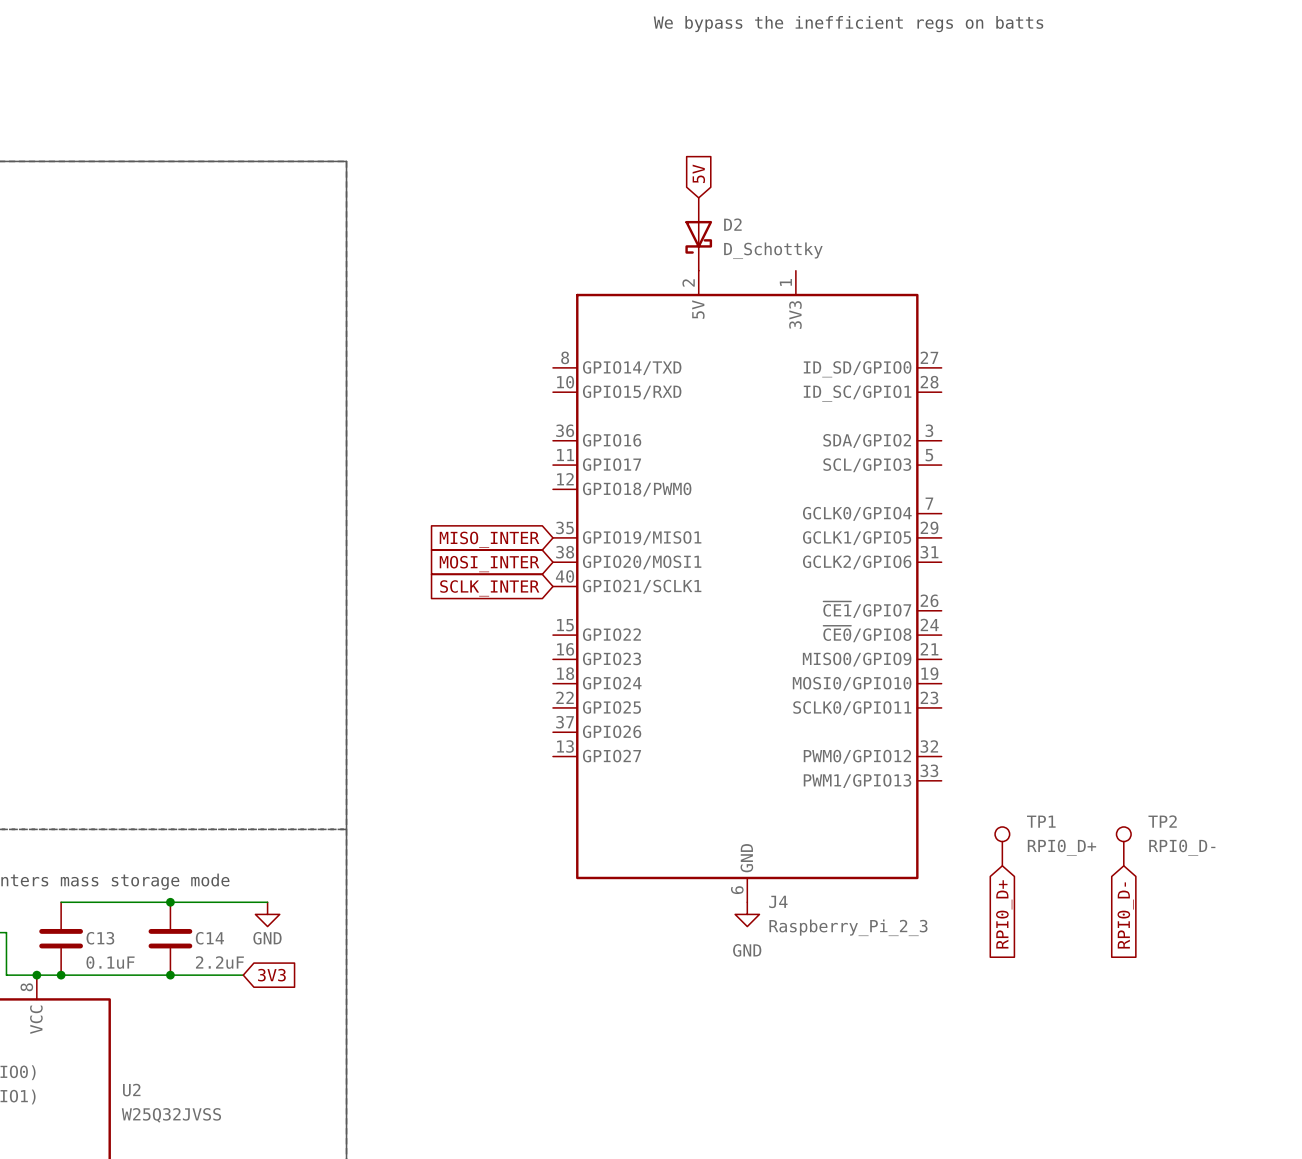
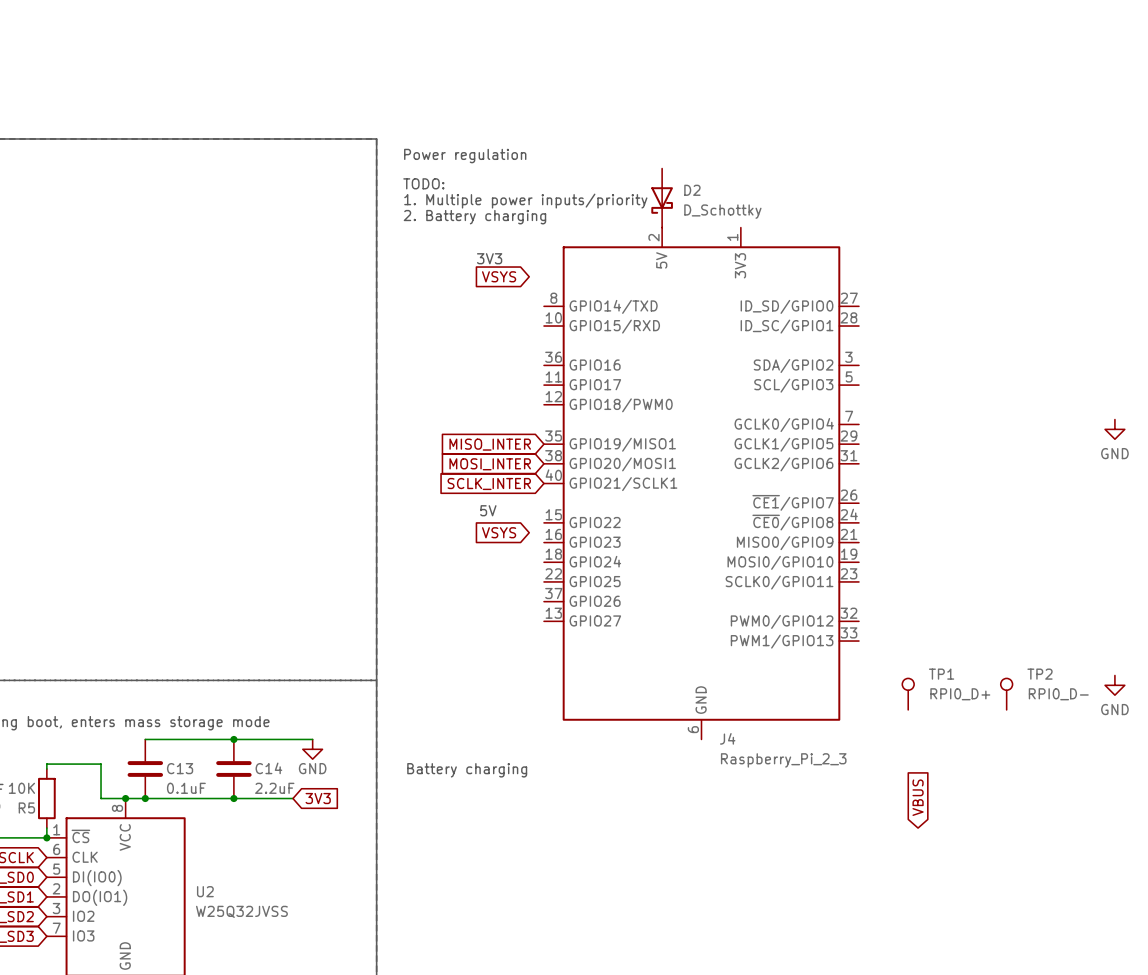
text: We bypass the inefficient regs on batts (848, 24) -> none
global label: 5V (698, 173) -> none
text: none -> Power regulation (465, 156)
text: none -> TODO: (423, 183)
text: none -> 1. Multiple power inputs/priority (525, 201)
text: none -> 2. Battery charging (474, 217)
text: none -> 3V3 (489, 258)
global label: none -> VSYS (499, 276)
power symbol: none -> GND (1114, 429)
text: none -> 5V (488, 510)
global label: none -> VSYS (499, 532)
power symbol: none -> GND (1114, 685)
power symbol: GND (747, 914) -> none
global label: RPI0_D+ (1004, 914) -> none
global label: RPI0_D- (1125, 915) -> none
text: none -> Battery charging (467, 770)
global label: none -> VBUS (918, 797)

